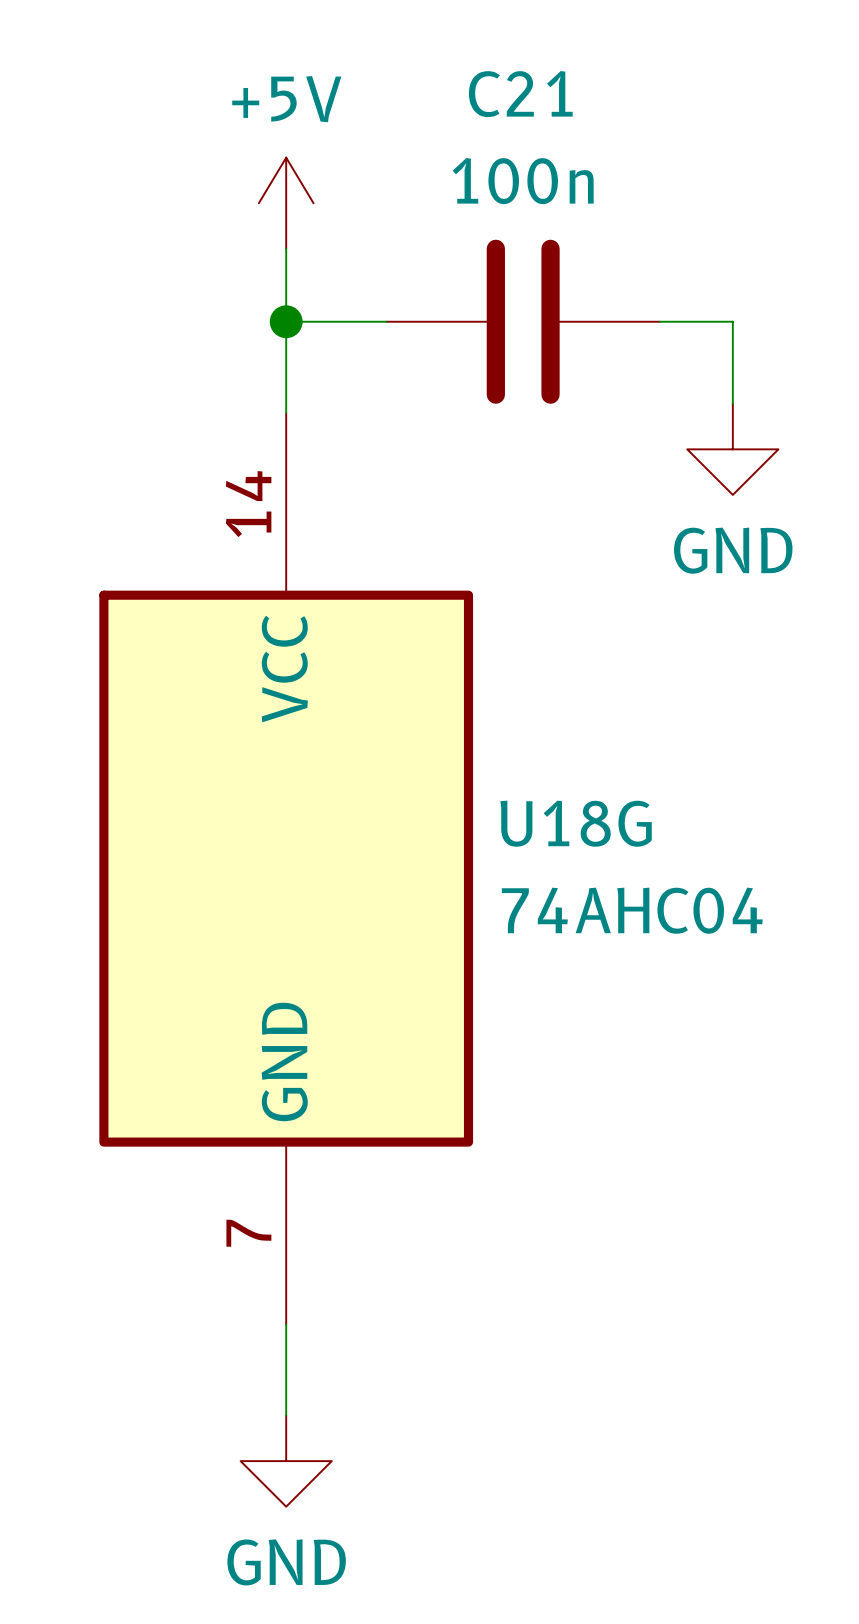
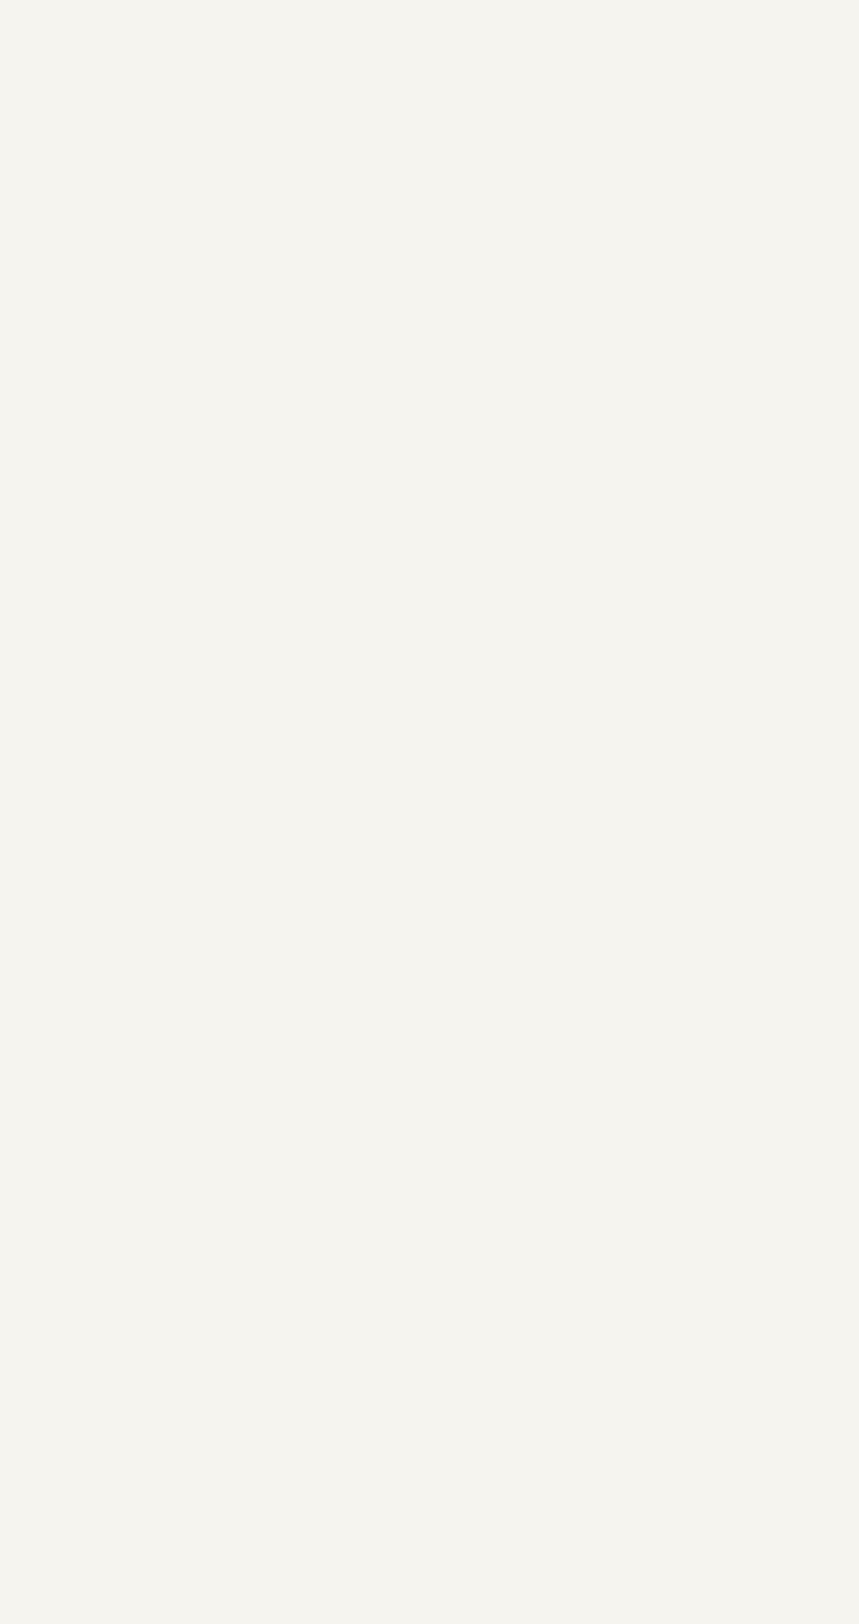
power symbol: +5V (286, 203) -> none
wire: (286, 248) (286, 412) -> none
wire: (286, 321) (386, 321) -> none
junction: (286, 321) -> none
C21: 100n (523, 321) -> none
wire: (659, 321) (732, 321) (732, 403) -> none
power symbol: GND (732, 449) -> none
U18G: 74AHC04 (286, 868) -> none
wire: (286, 1324) (286, 1415) -> none
power symbol: GND (286, 1461) -> none

